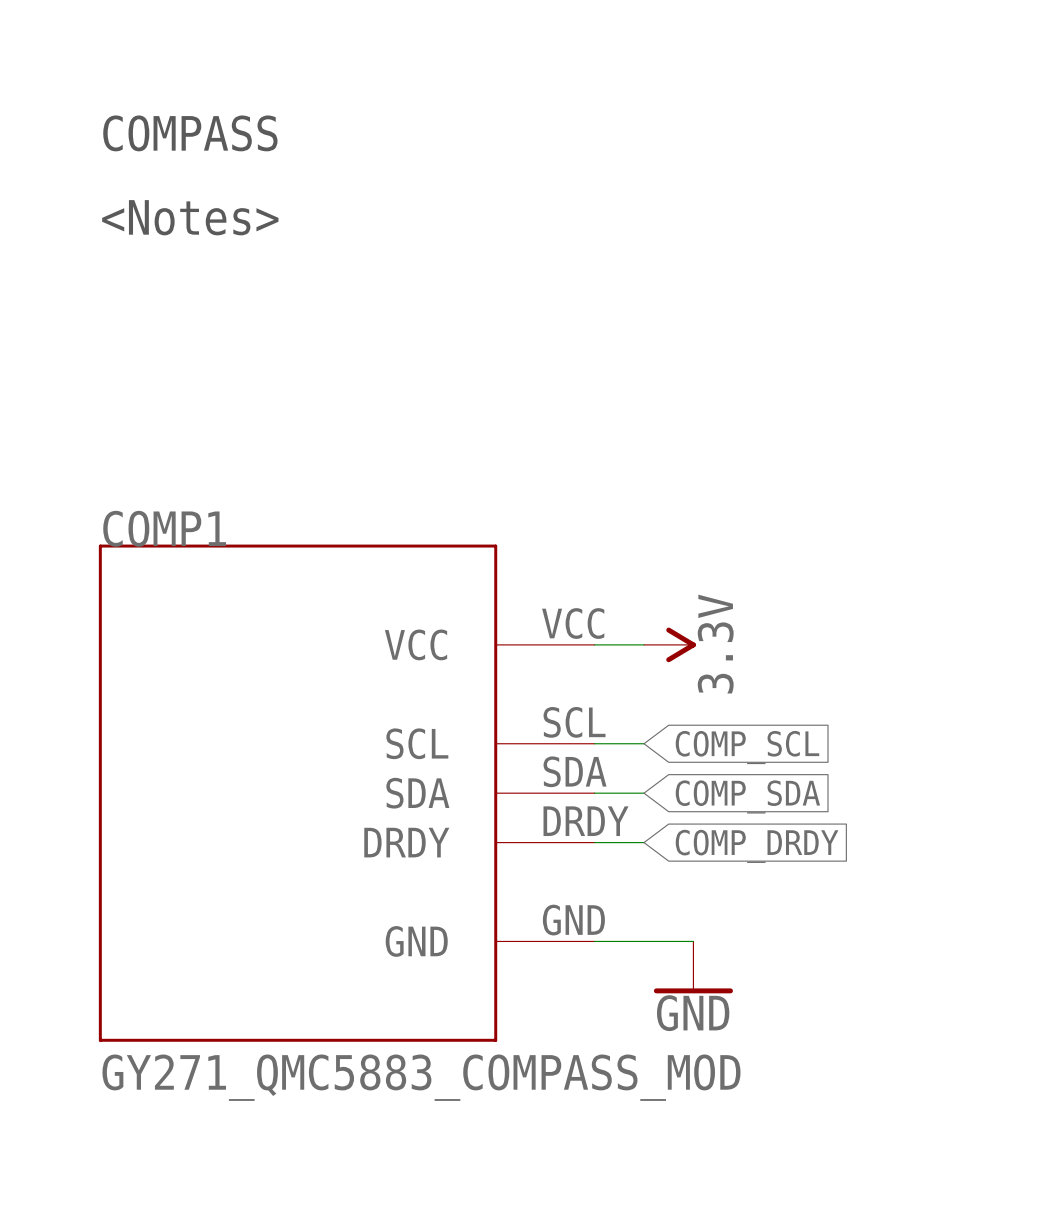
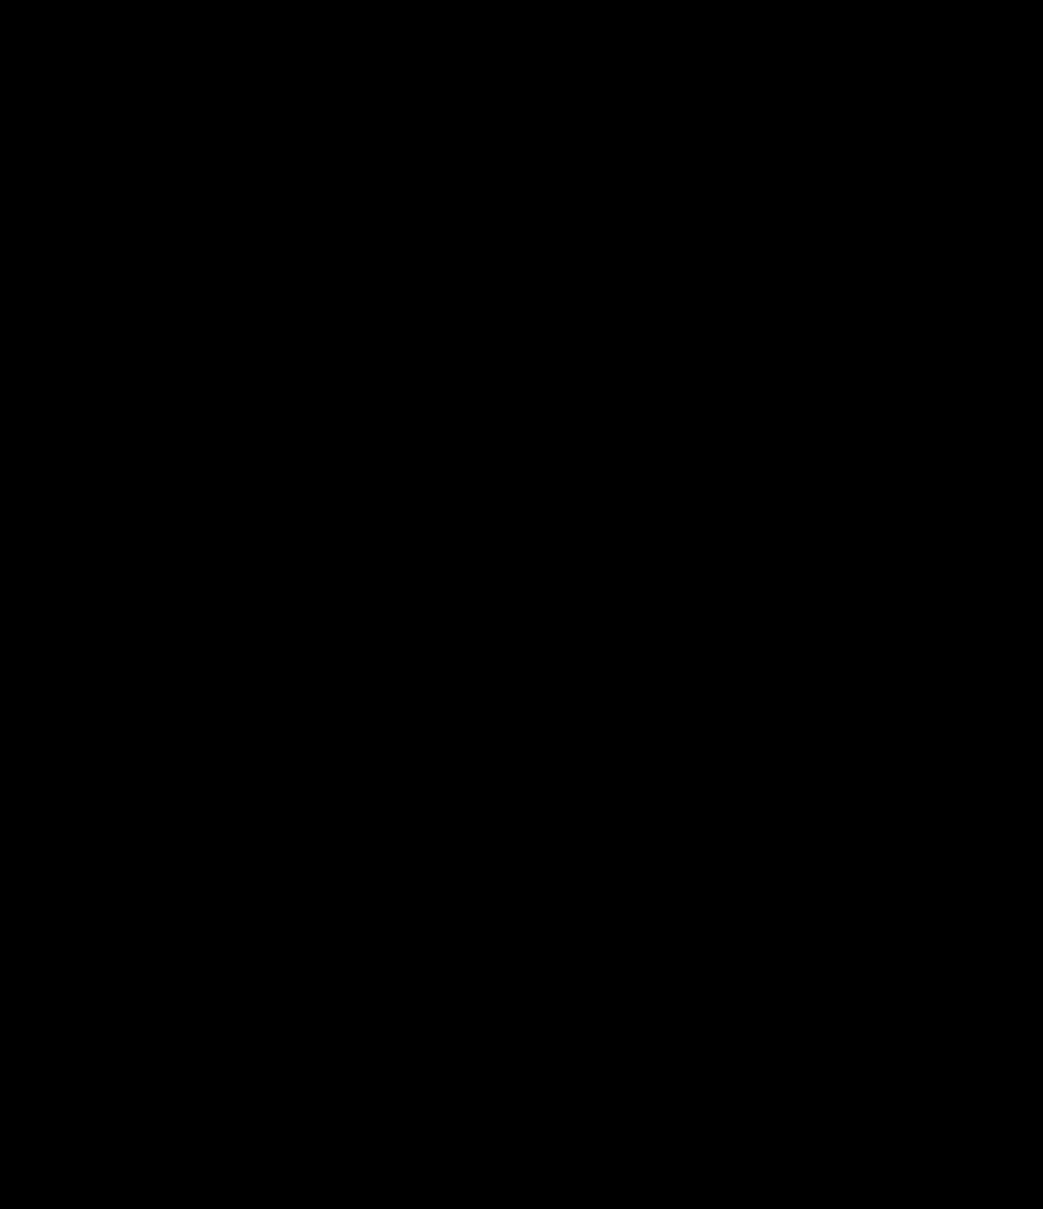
text: COMPASS (190, 133) -> none
text: <Notes> (190, 217) -> none
wire: (594, 644) (644, 644) -> none
power symbol: 3.3V (669, 644) -> none
wire: (594, 743) (644, 743) -> none
global label: COMP_SCL (747, 747) -> none
COMP1: GY271_QMC5883_COMPASS_MOD (346, 793) -> none
wire: (594, 793) (644, 793) -> none
global label: COMP_SDA (747, 796) -> none
wire: (594, 842) (644, 842) -> none
global label: COMP_DRDY (757, 846) -> none
wire: (594, 941) (693, 941) -> none
power symbol: GND (693, 967) -> none

